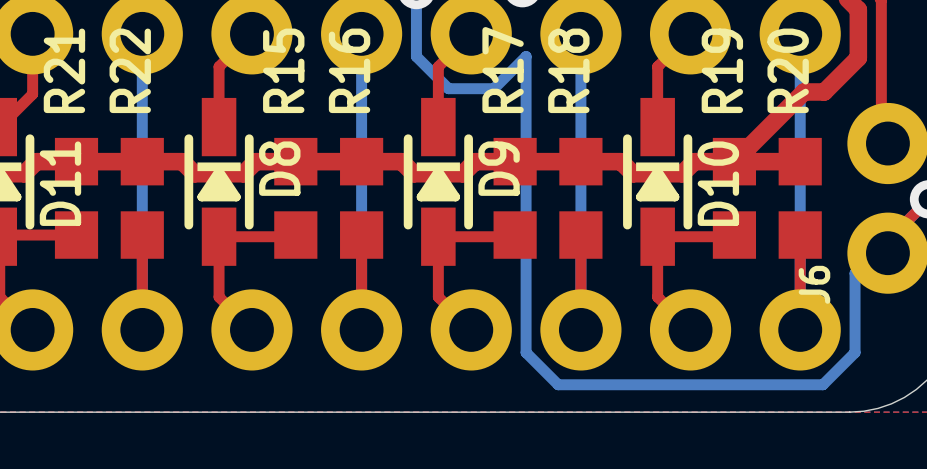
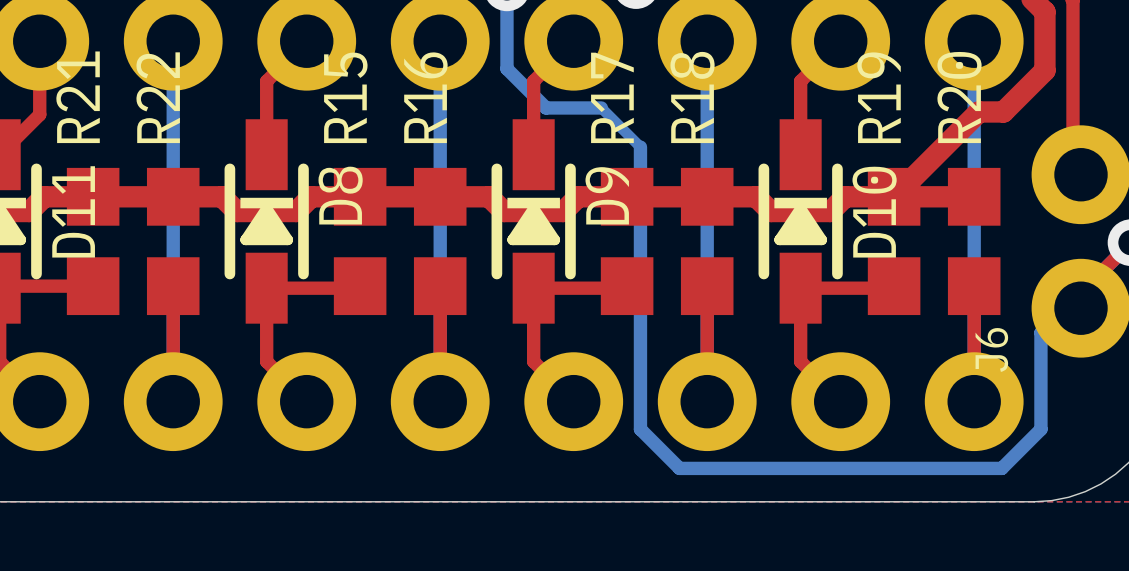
bottom track: (493, 88) (526, 56) (526, 120) -> (601, 107) (640, 147)

